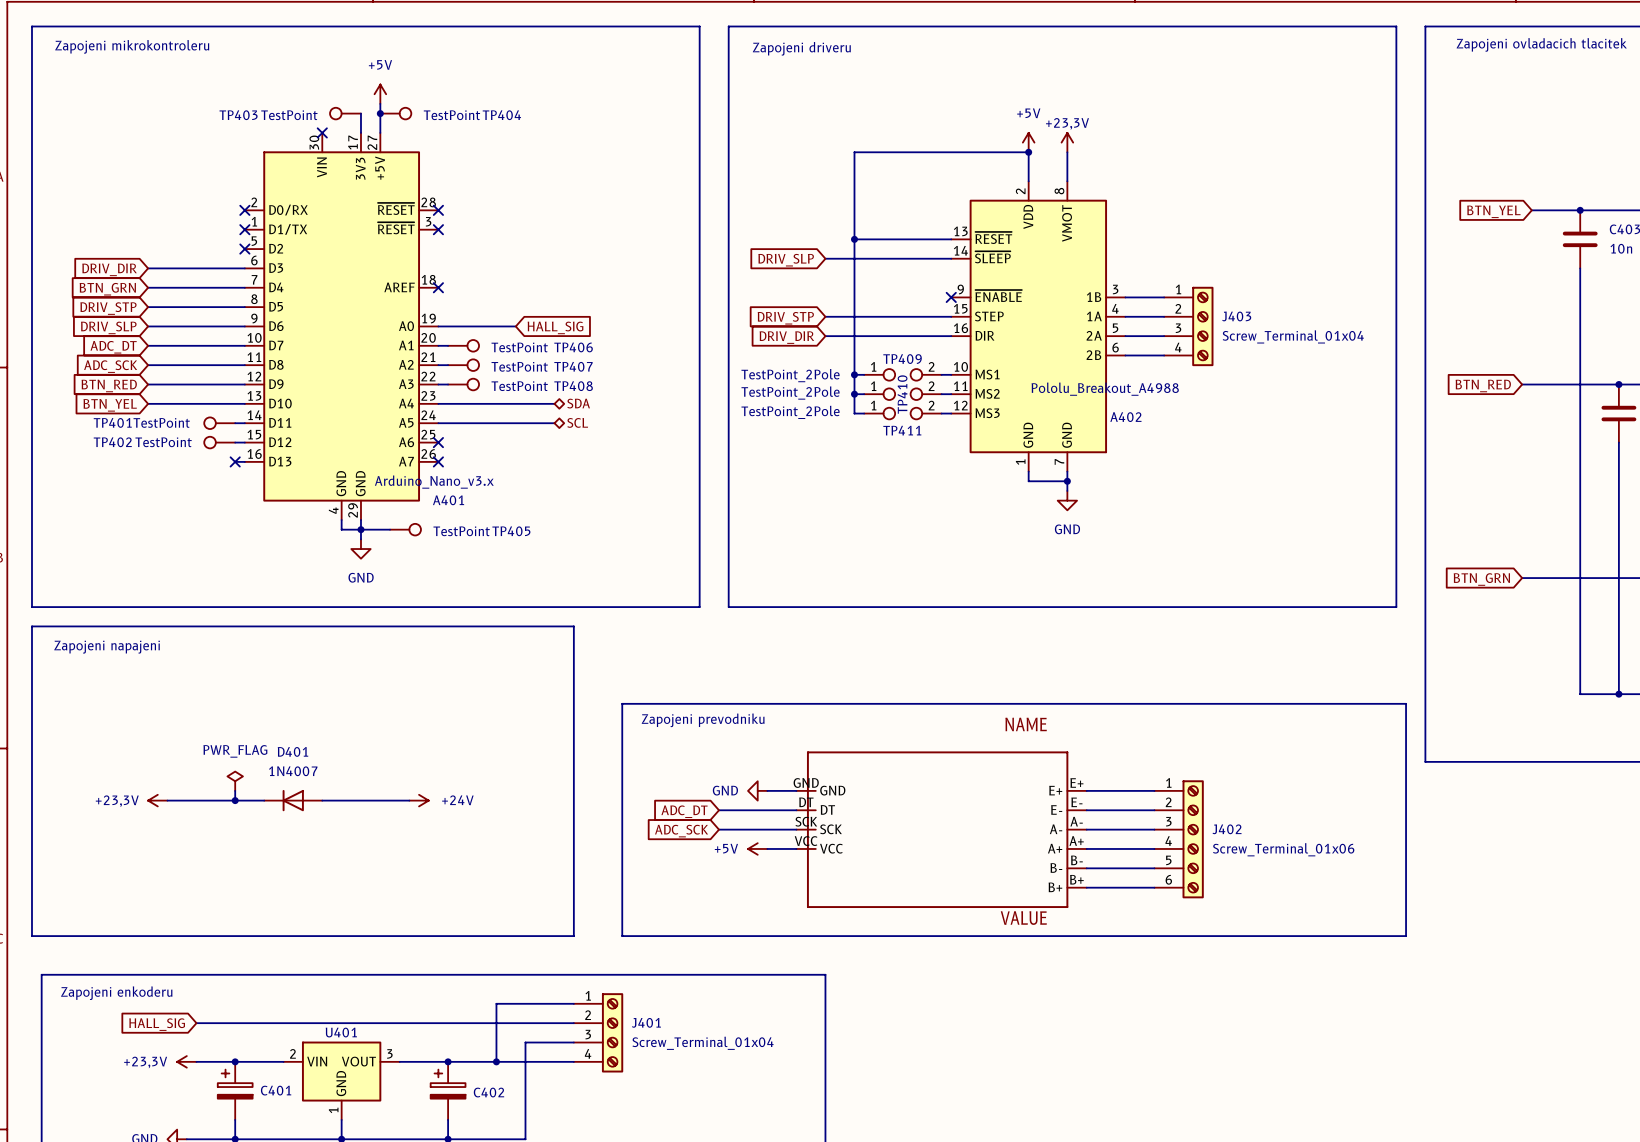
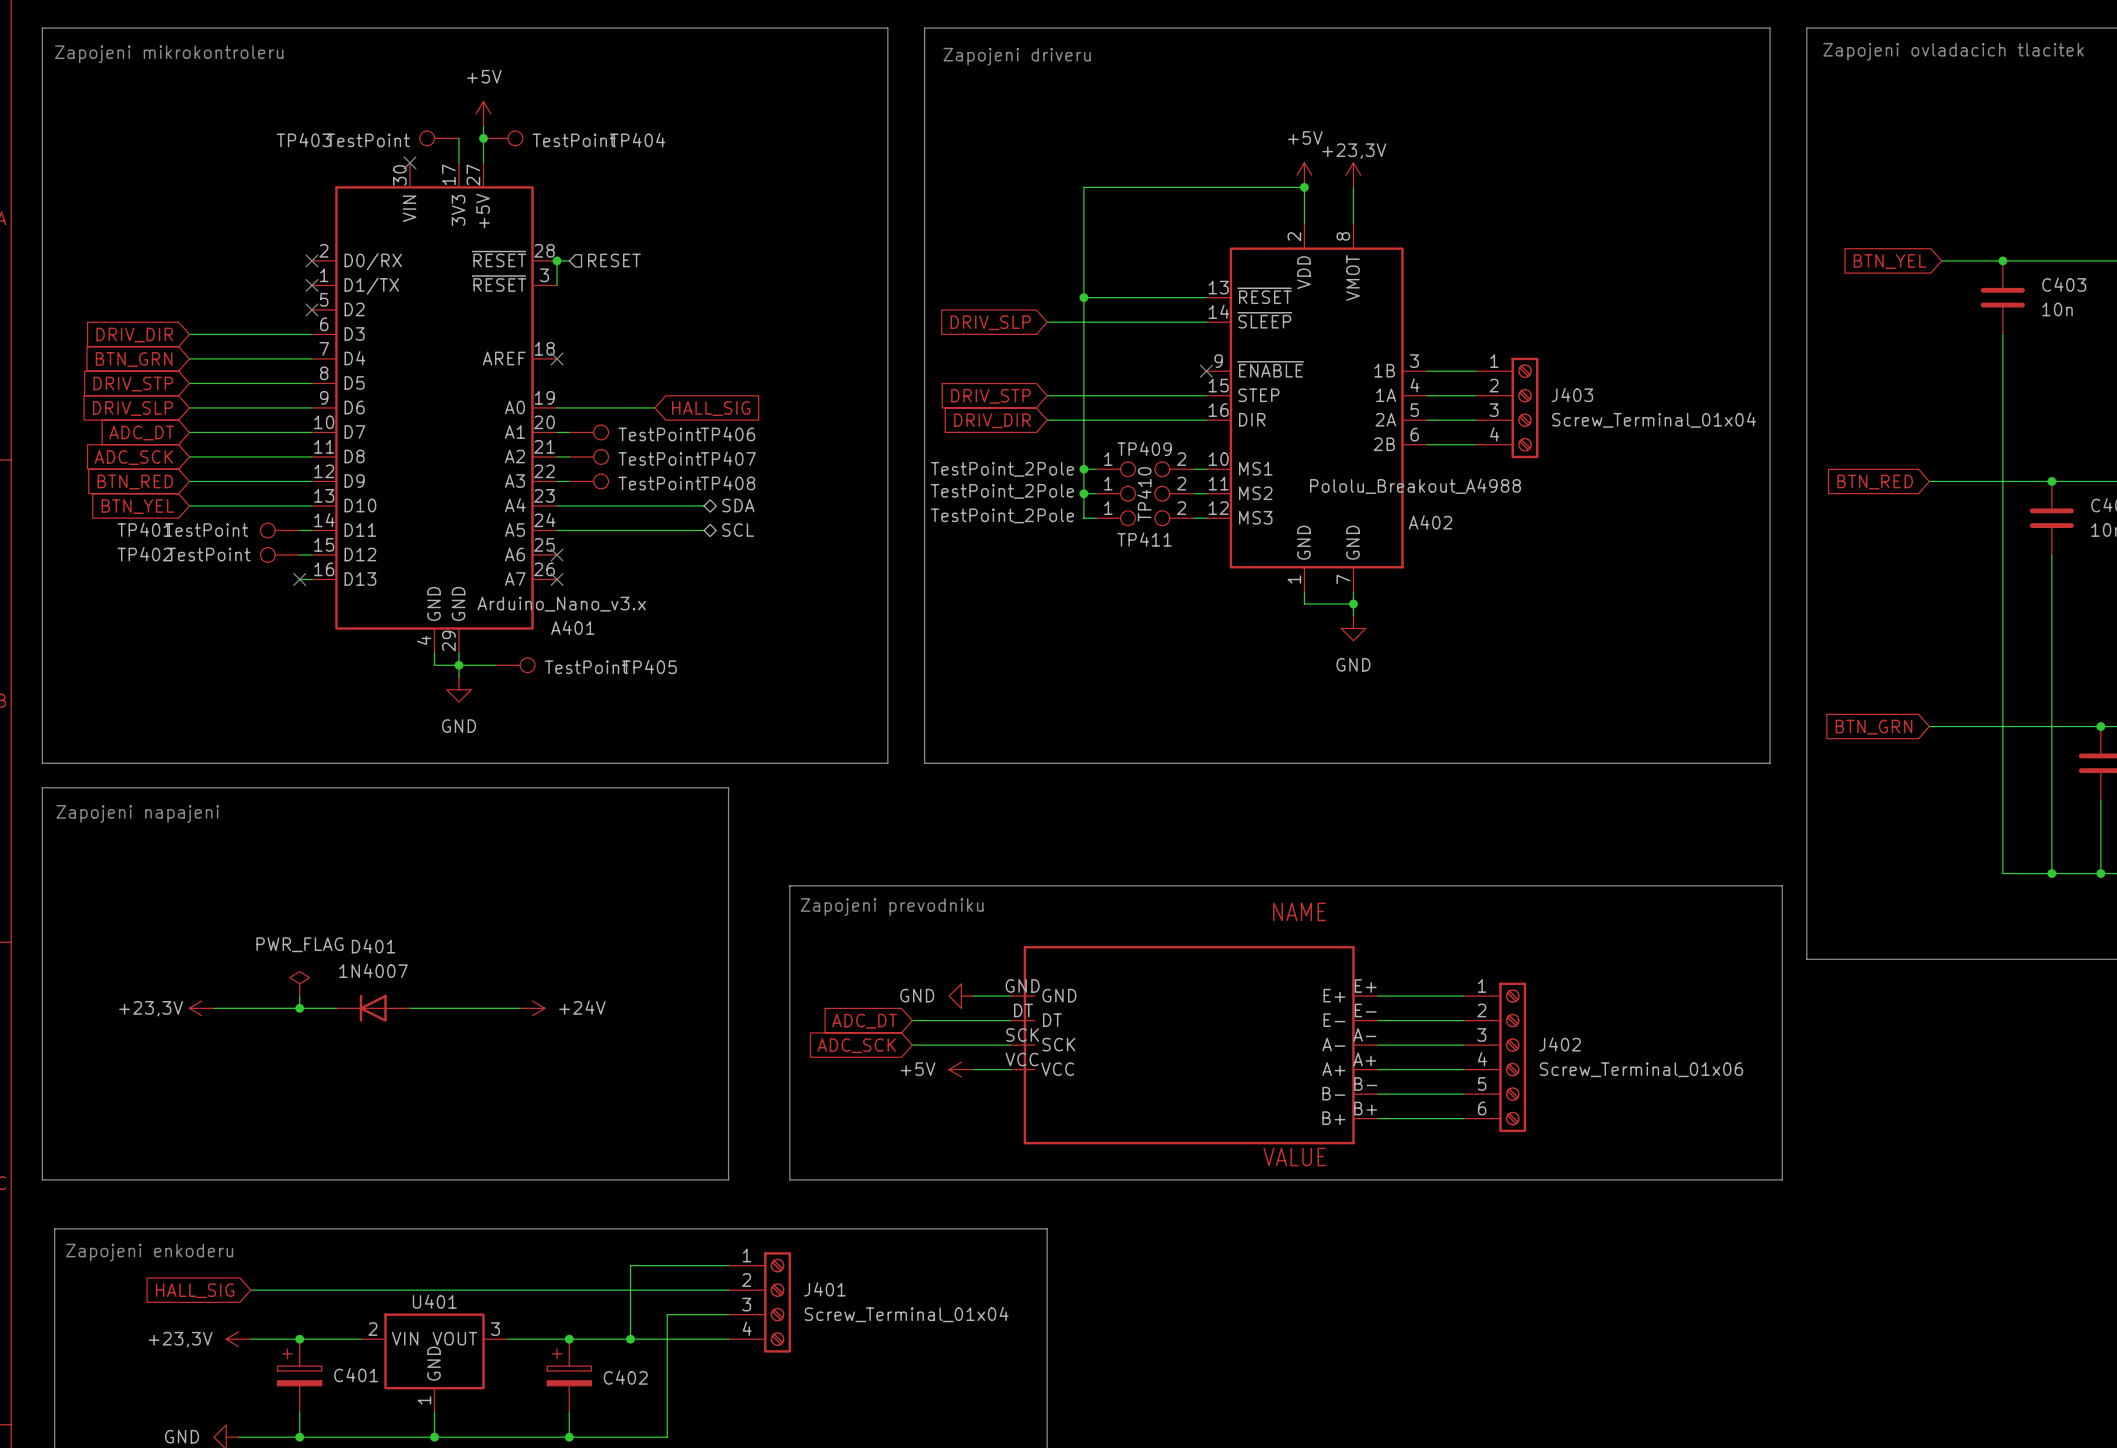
no-connect mark: (438, 210) -> none
junction: none -> (557, 260)
wire: none -> (569, 260) (557, 260) (557, 285)
hierarchical label: none -> RESET (614, 260)
no-connect mark: (438, 229) -> none

